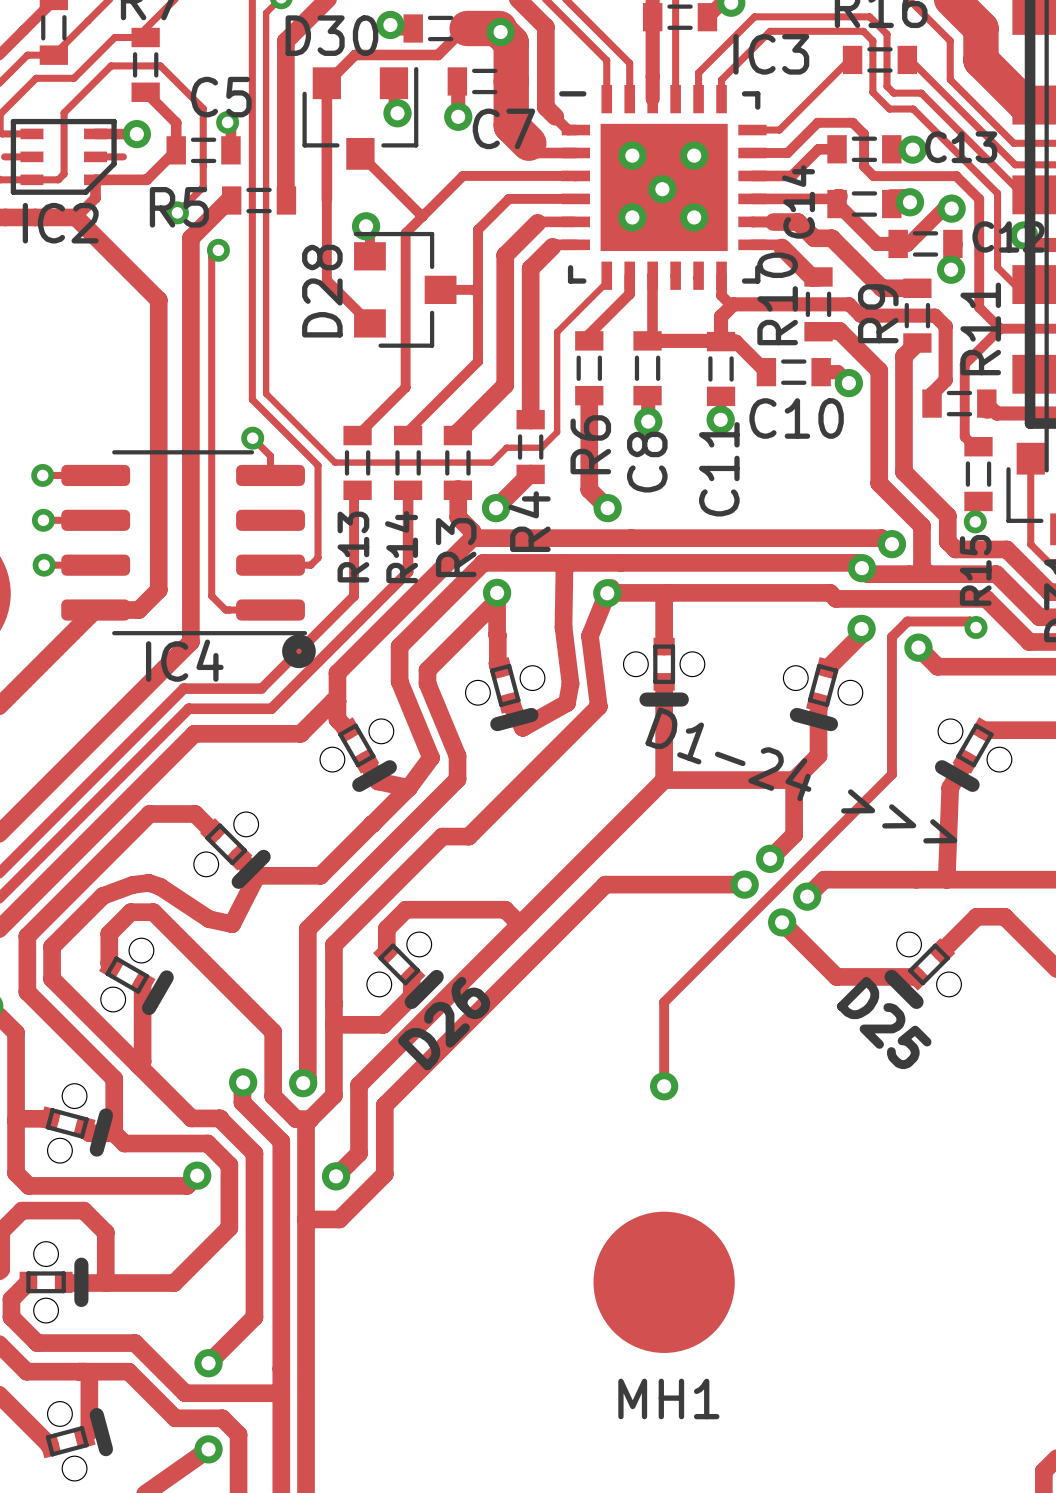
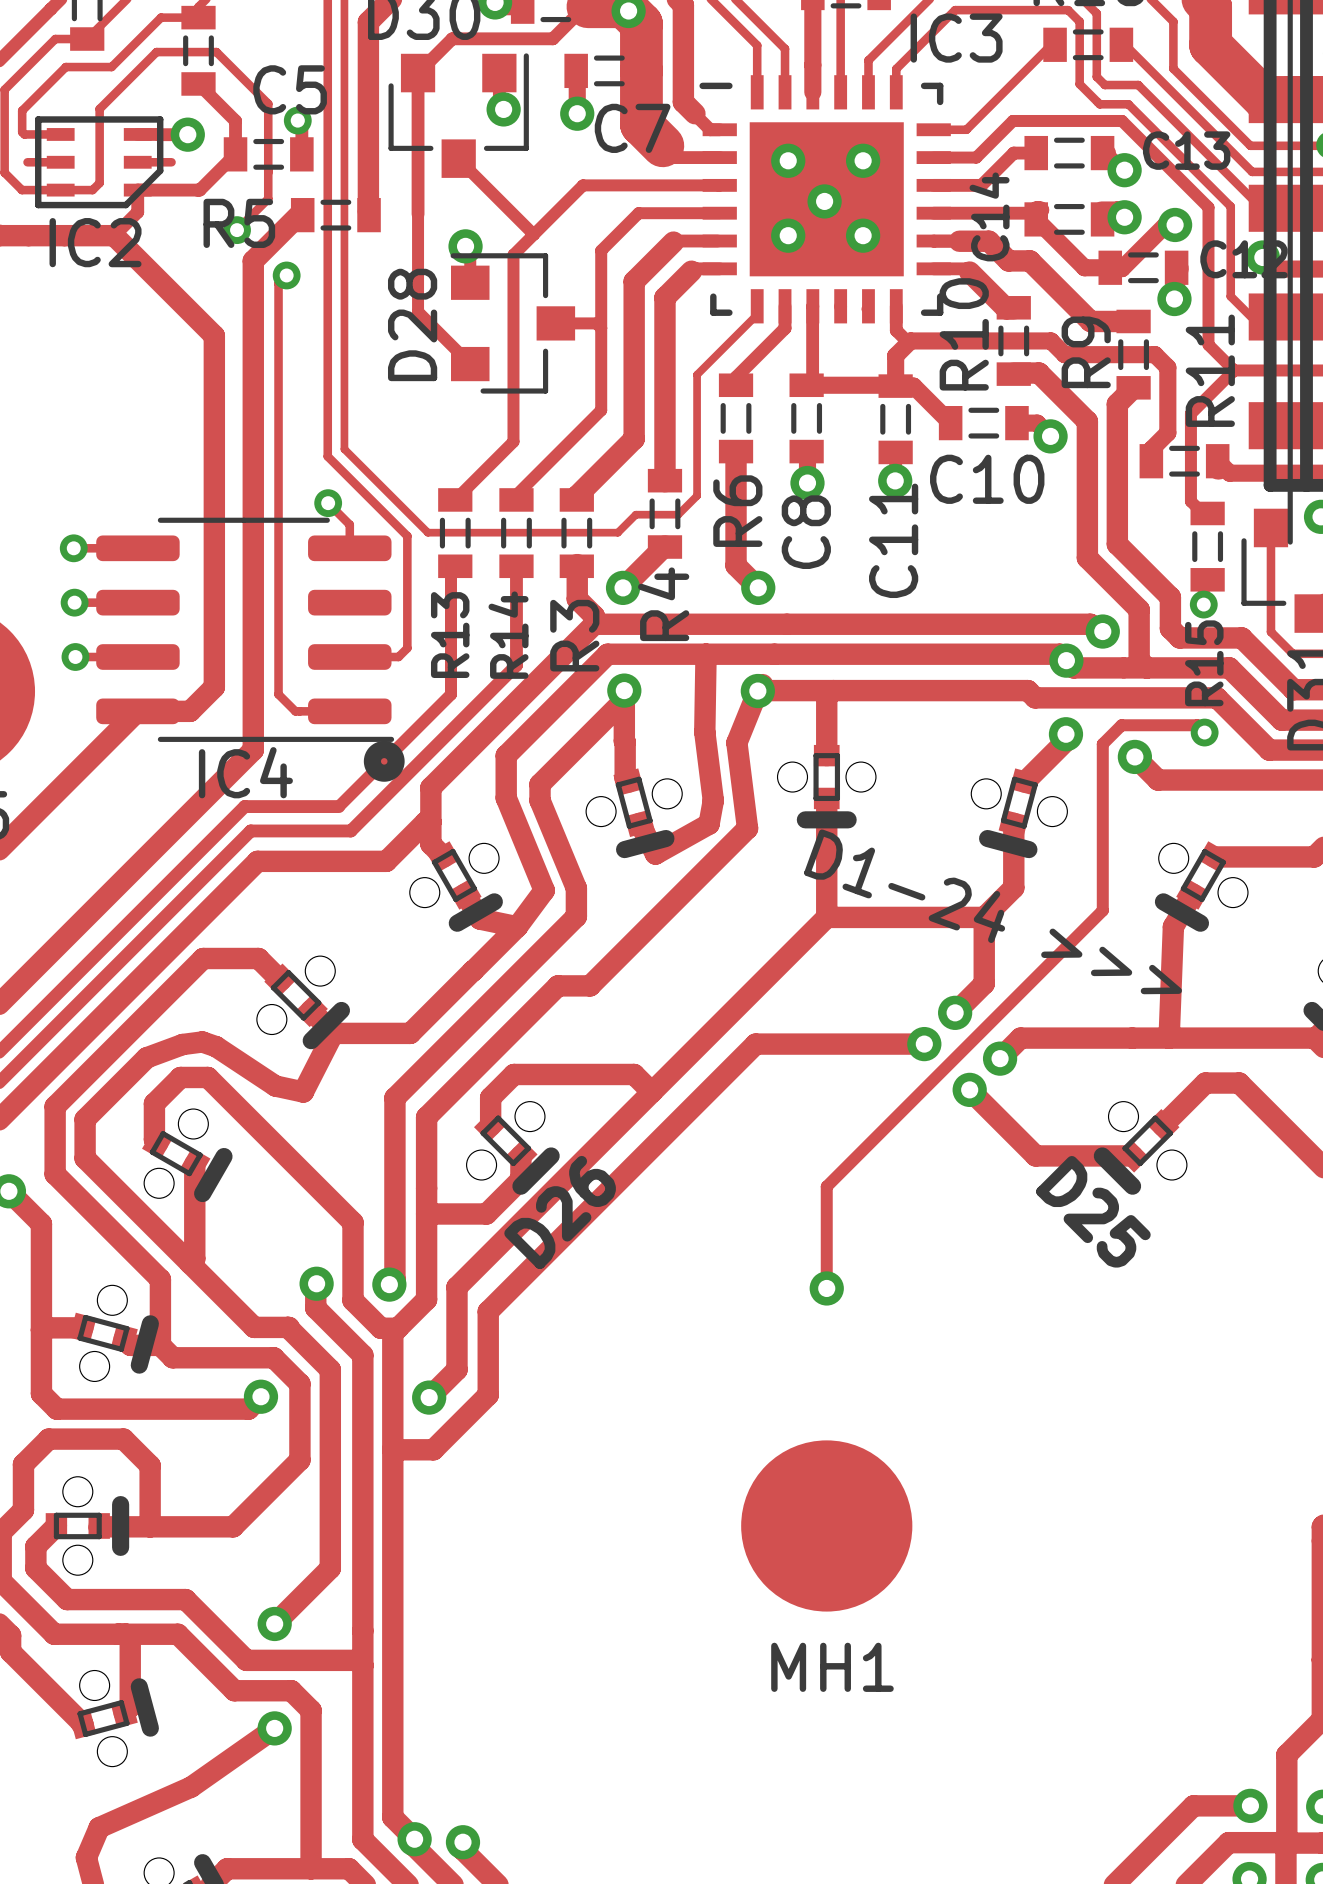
track: (852, 122) (864, 134) (864, 166) (873, 176) (956, 176) (979, 199) -> (1055, 120) (1122, 120) (1208, 207) (1208, 213)
via position: (912, 149) -> (1124, 170)

